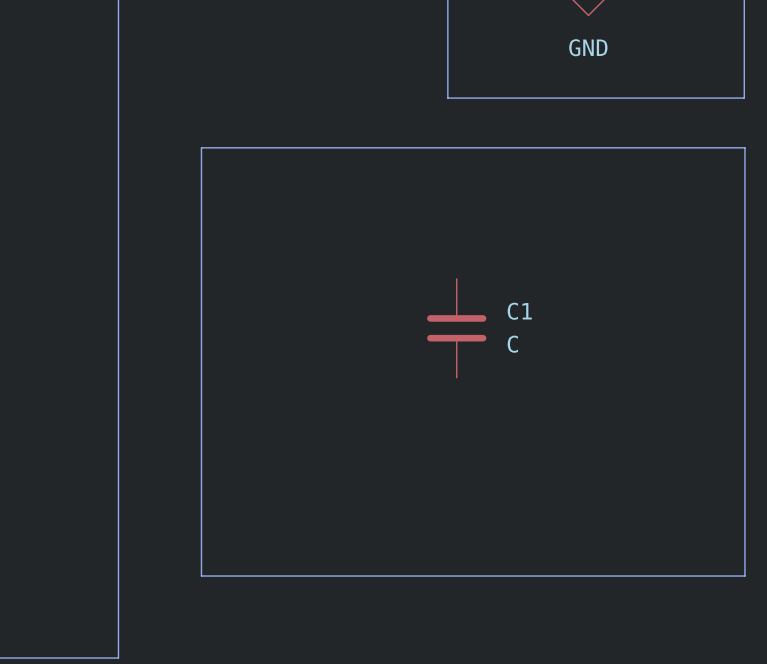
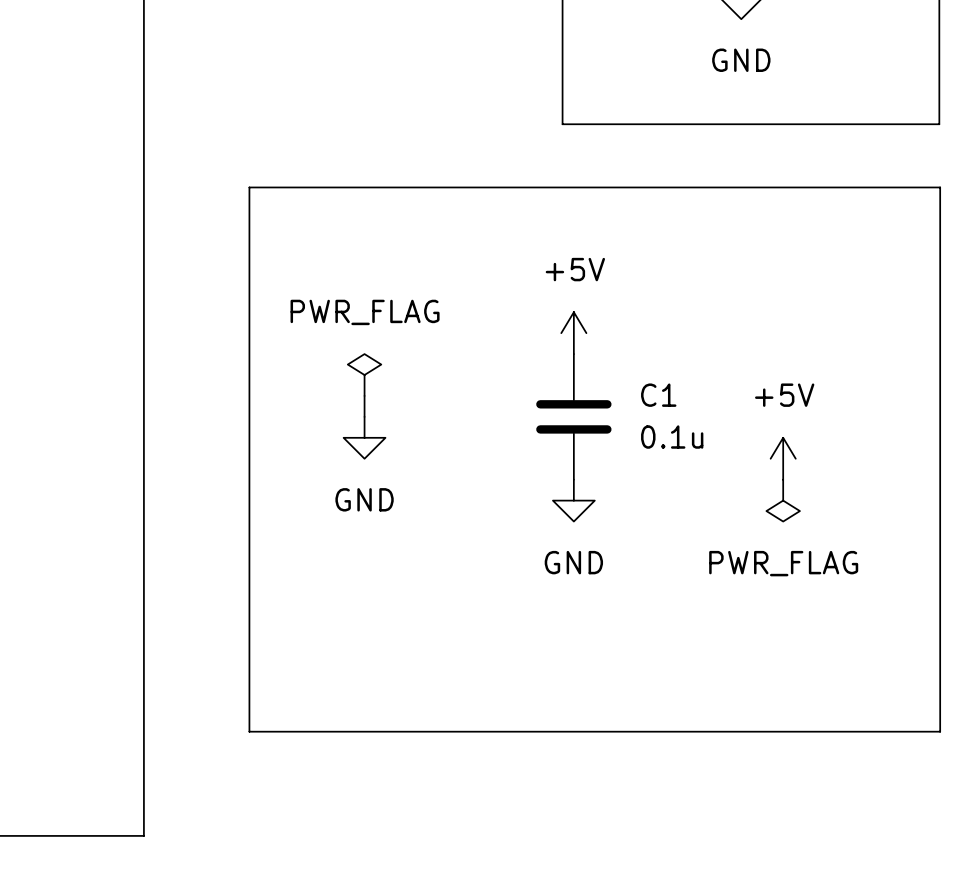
power symbol: none -> +5V (573, 333)
power symbol: none -> PWR_FLAG (364, 375)
wire: none -> (364, 395) (364, 416)
power symbol: none -> GND (364, 437)
C1 value: C (512, 344) -> 0.1u (672, 437)
power symbol: none -> +5V (783, 458)
power symbol: none -> GND (573, 500)
power symbol: none -> PWR_FLAG (783, 500)

